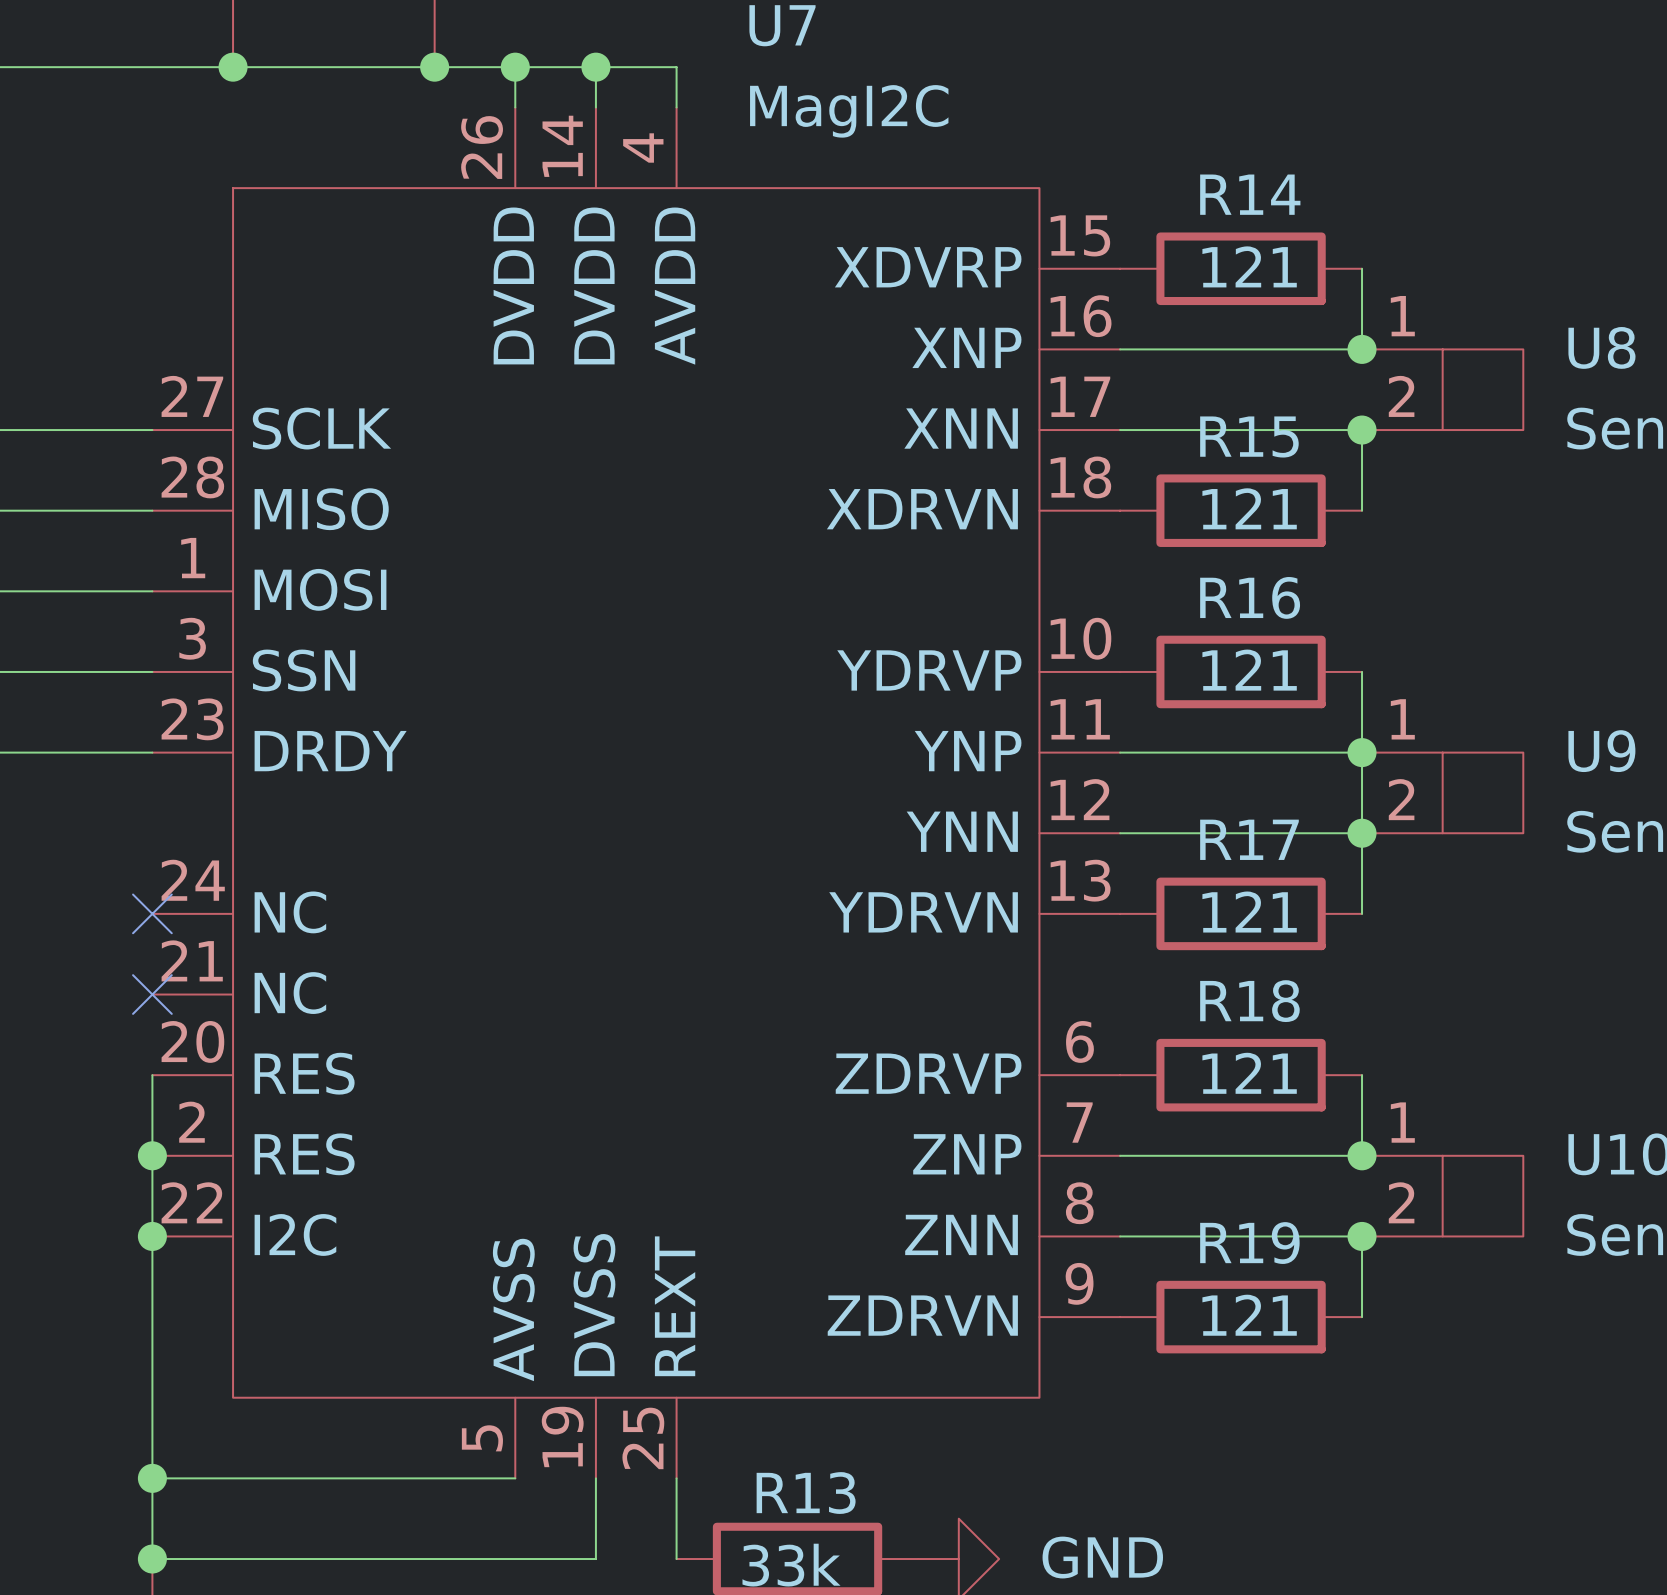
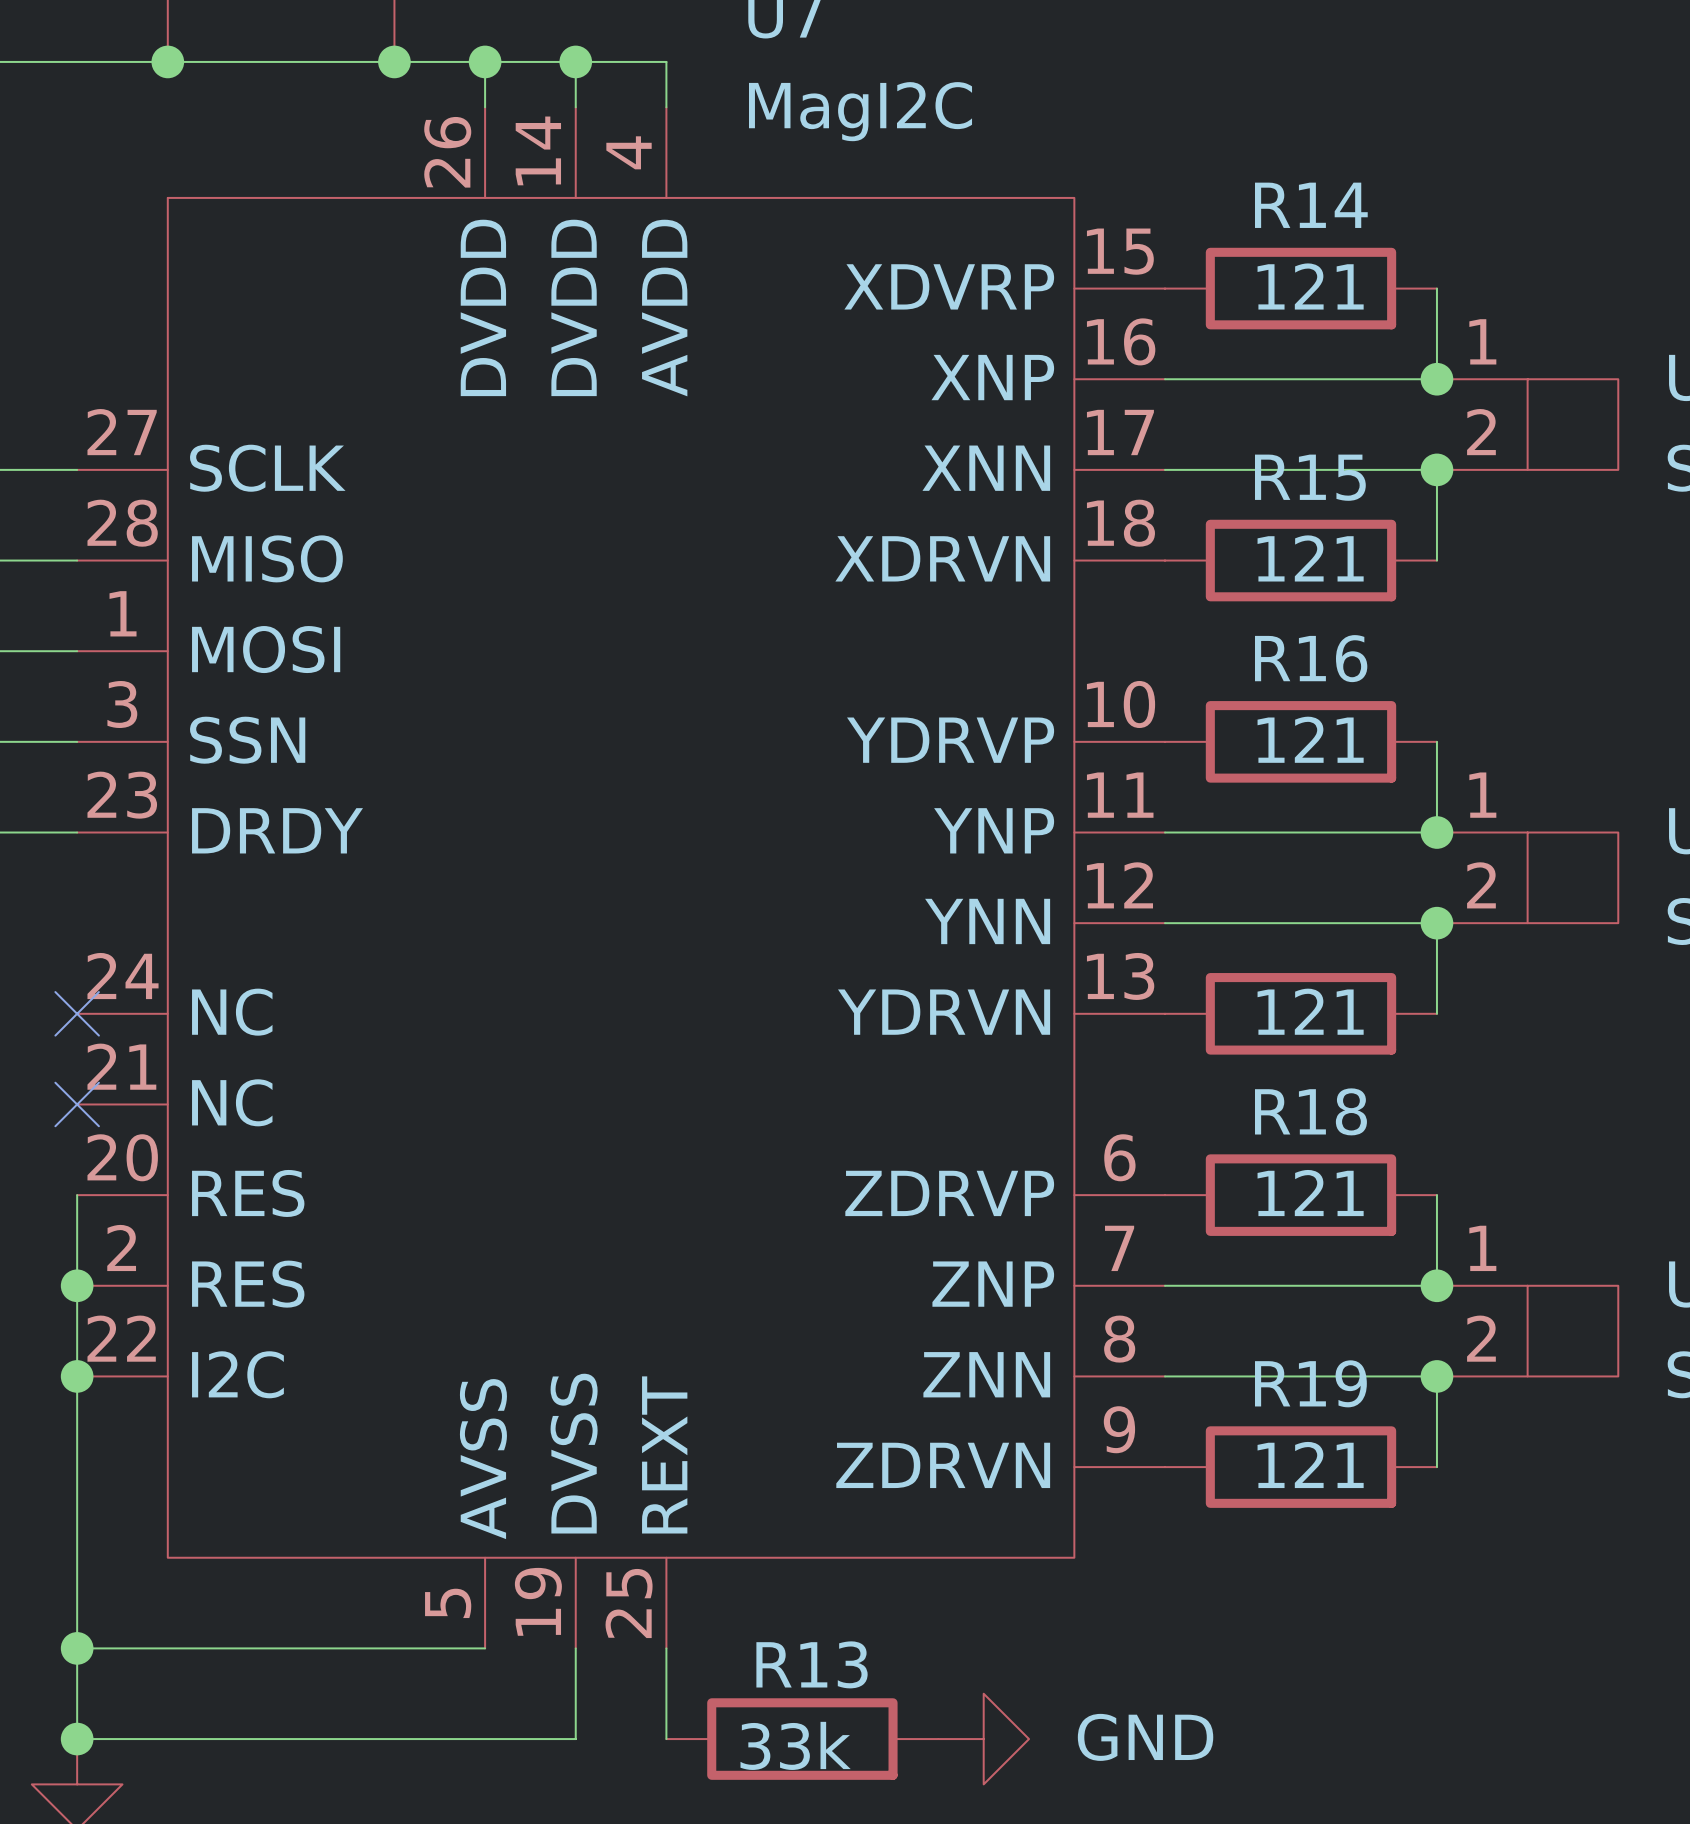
wire: (1362, 752) (1362, 833) -> none
R17 name: R17 (1249, 839) -> none

